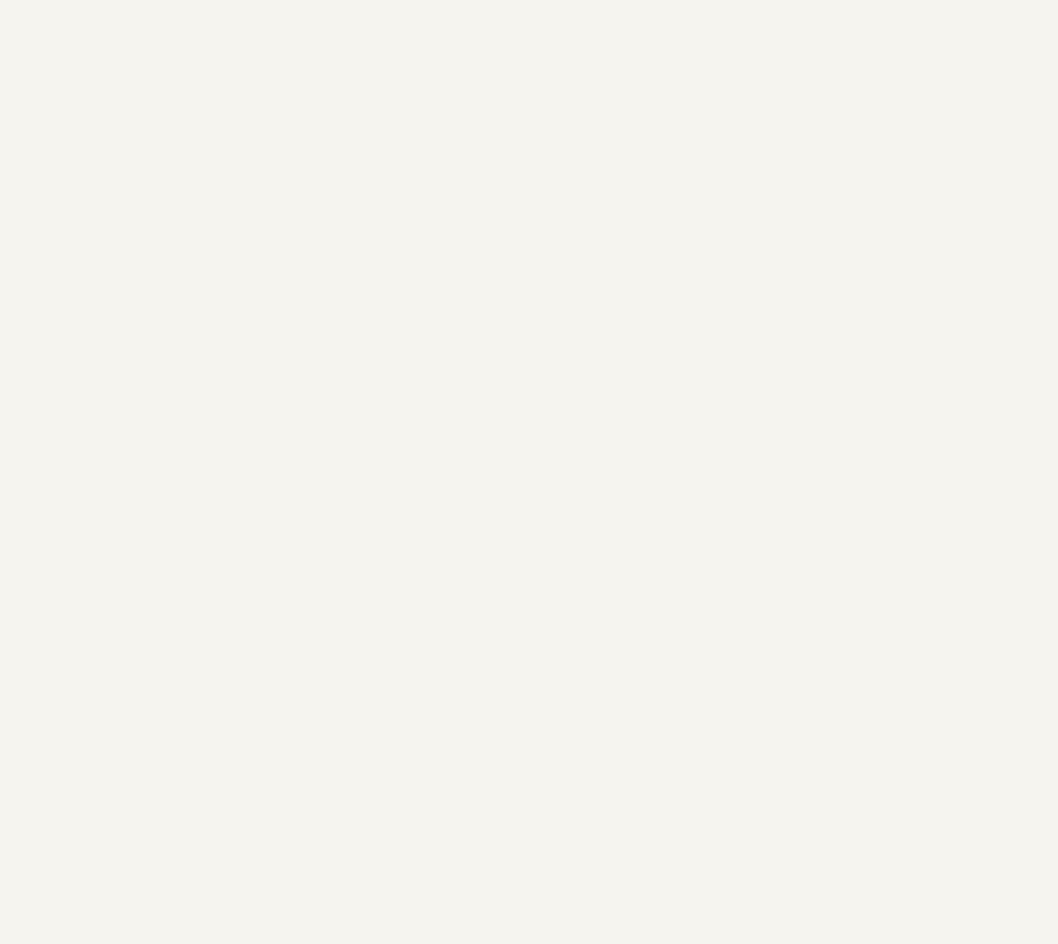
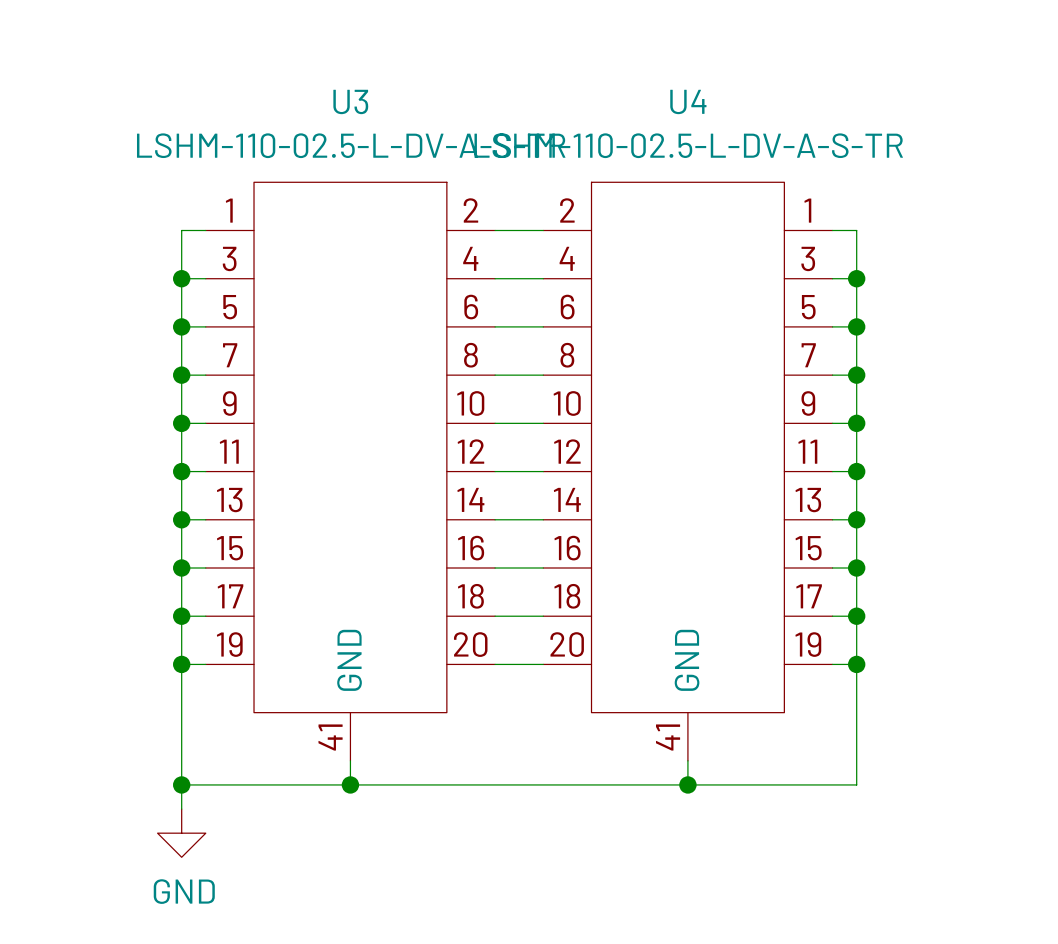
wire: none -> (205, 230) (181, 230) (181, 809)
wire: none -> (495, 230) (543, 230)
wire: none -> (832, 230) (856, 230) (856, 784) (181, 784)
wire: none -> (181, 278) (205, 278)
junction: none -> (181, 278)
wire: none -> (495, 278) (543, 278)
wire: none -> (832, 278) (856, 278)
junction: none -> (856, 278)
wire: none -> (181, 326) (205, 326)
junction: none -> (181, 326)
wire: none -> (495, 326) (543, 326)
wire: none -> (832, 326) (856, 326)
junction: none -> (856, 326)
wire: none -> (181, 375) (205, 375)
junction: none -> (181, 375)
wire: none -> (495, 375) (543, 375)
wire: none -> (832, 375) (856, 375)
junction: none -> (856, 375)
wire: none -> (181, 423) (205, 423)
junction: none -> (181, 423)
wire: none -> (495, 423) (543, 423)
wire: none -> (832, 423) (856, 423)
junction: none -> (856, 423)
wire: none -> (181, 471) (205, 471)
junction: none -> (181, 471)
U3: none -> LSHM-110-02.5-L-DV-A-S-TR (350, 471)
wire: none -> (495, 471) (543, 471)
U4: none -> LSHM-110-02.5-L-DV-A-S-TR (687, 471)
wire: none -> (832, 471) (856, 471)
junction: none -> (856, 471)
wire: none -> (181, 519) (205, 519)
junction: none -> (181, 519)
wire: none -> (495, 519) (543, 519)
wire: none -> (832, 519) (856, 519)
junction: none -> (856, 519)
wire: none -> (181, 568) (205, 568)
junction: none -> (181, 568)
wire: none -> (495, 568) (543, 568)
wire: none -> (832, 568) (856, 568)
junction: none -> (856, 568)
wire: none -> (181, 616) (205, 616)
junction: none -> (181, 616)
wire: none -> (495, 616) (543, 616)
wire: none -> (832, 616) (856, 616)
junction: none -> (856, 616)
wire: none -> (181, 664) (205, 664)
junction: none -> (181, 664)
wire: none -> (495, 664) (543, 664)
wire: none -> (832, 664) (856, 664)
junction: none -> (856, 664)
wire: none -> (350, 760) (350, 784)
wire: none -> (687, 760) (687, 784)
junction: none -> (181, 784)
junction: none -> (350, 784)
junction: none -> (687, 784)
power symbol: none -> GND (181, 833)

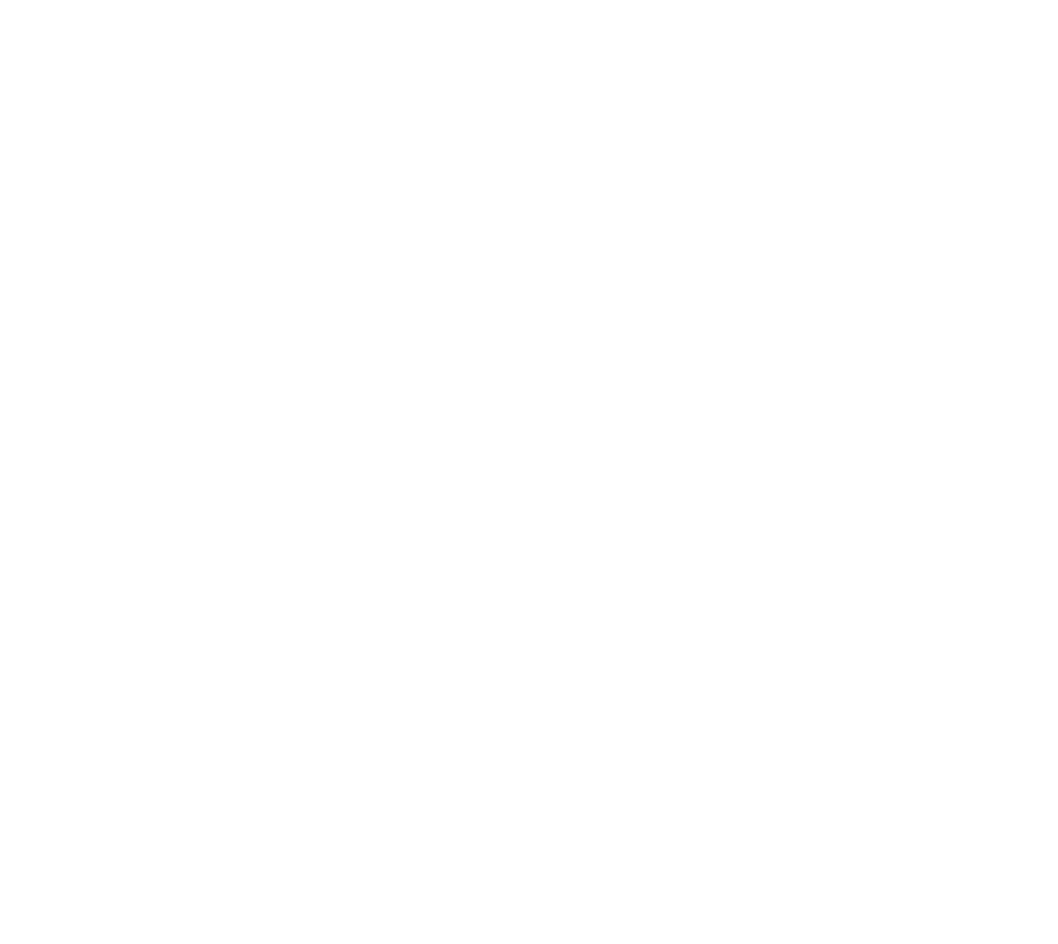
wire: (205, 230) (181, 230) (181, 809) -> none
wire: (495, 230) (543, 230) -> none
wire: (832, 230) (856, 230) (856, 784) (181, 784) -> none
wire: (181, 278) (205, 278) -> none
junction: (181, 278) -> none
wire: (495, 278) (543, 278) -> none
wire: (832, 278) (856, 278) -> none
junction: (856, 278) -> none
wire: (181, 326) (205, 326) -> none
junction: (181, 326) -> none
wire: (495, 326) (543, 326) -> none
wire: (832, 326) (856, 326) -> none
junction: (856, 326) -> none
wire: (181, 375) (205, 375) -> none
junction: (181, 375) -> none
wire: (495, 375) (543, 375) -> none
wire: (832, 375) (856, 375) -> none
junction: (856, 375) -> none
wire: (181, 423) (205, 423) -> none
junction: (181, 423) -> none
wire: (495, 423) (543, 423) -> none
wire: (832, 423) (856, 423) -> none
junction: (856, 423) -> none
wire: (181, 471) (205, 471) -> none
junction: (181, 471) -> none
U3: LSHM-110-02.5-L-DV-A-S-TR (350, 471) -> none
wire: (495, 471) (543, 471) -> none
U4: LSHM-110-02.5-L-DV-A-S-TR (687, 471) -> none
wire: (832, 471) (856, 471) -> none
junction: (856, 471) -> none
wire: (181, 519) (205, 519) -> none
junction: (181, 519) -> none
wire: (495, 519) (543, 519) -> none
wire: (832, 519) (856, 519) -> none
junction: (856, 519) -> none
wire: (181, 568) (205, 568) -> none
junction: (181, 568) -> none
wire: (495, 568) (543, 568) -> none
wire: (832, 568) (856, 568) -> none
junction: (856, 568) -> none
wire: (181, 616) (205, 616) -> none
junction: (181, 616) -> none
wire: (495, 616) (543, 616) -> none
wire: (832, 616) (856, 616) -> none
junction: (856, 616) -> none
wire: (181, 664) (205, 664) -> none
junction: (181, 664) -> none
wire: (495, 664) (543, 664) -> none
wire: (832, 664) (856, 664) -> none
junction: (856, 664) -> none
wire: (350, 760) (350, 784) -> none
wire: (687, 760) (687, 784) -> none
junction: (181, 784) -> none
junction: (350, 784) -> none
junction: (687, 784) -> none
power symbol: GND (181, 833) -> none

